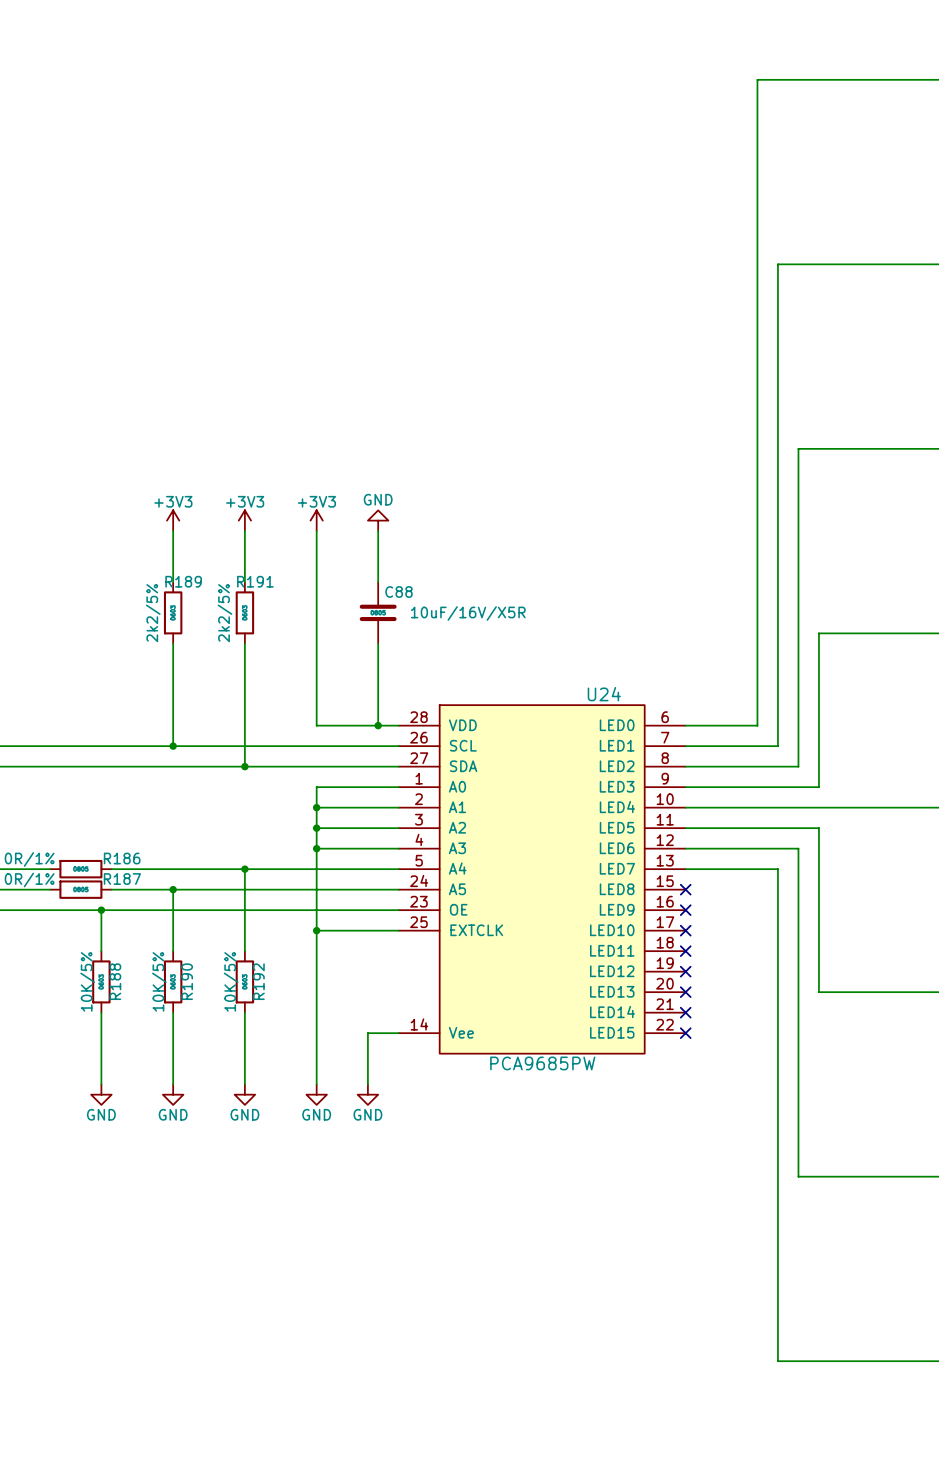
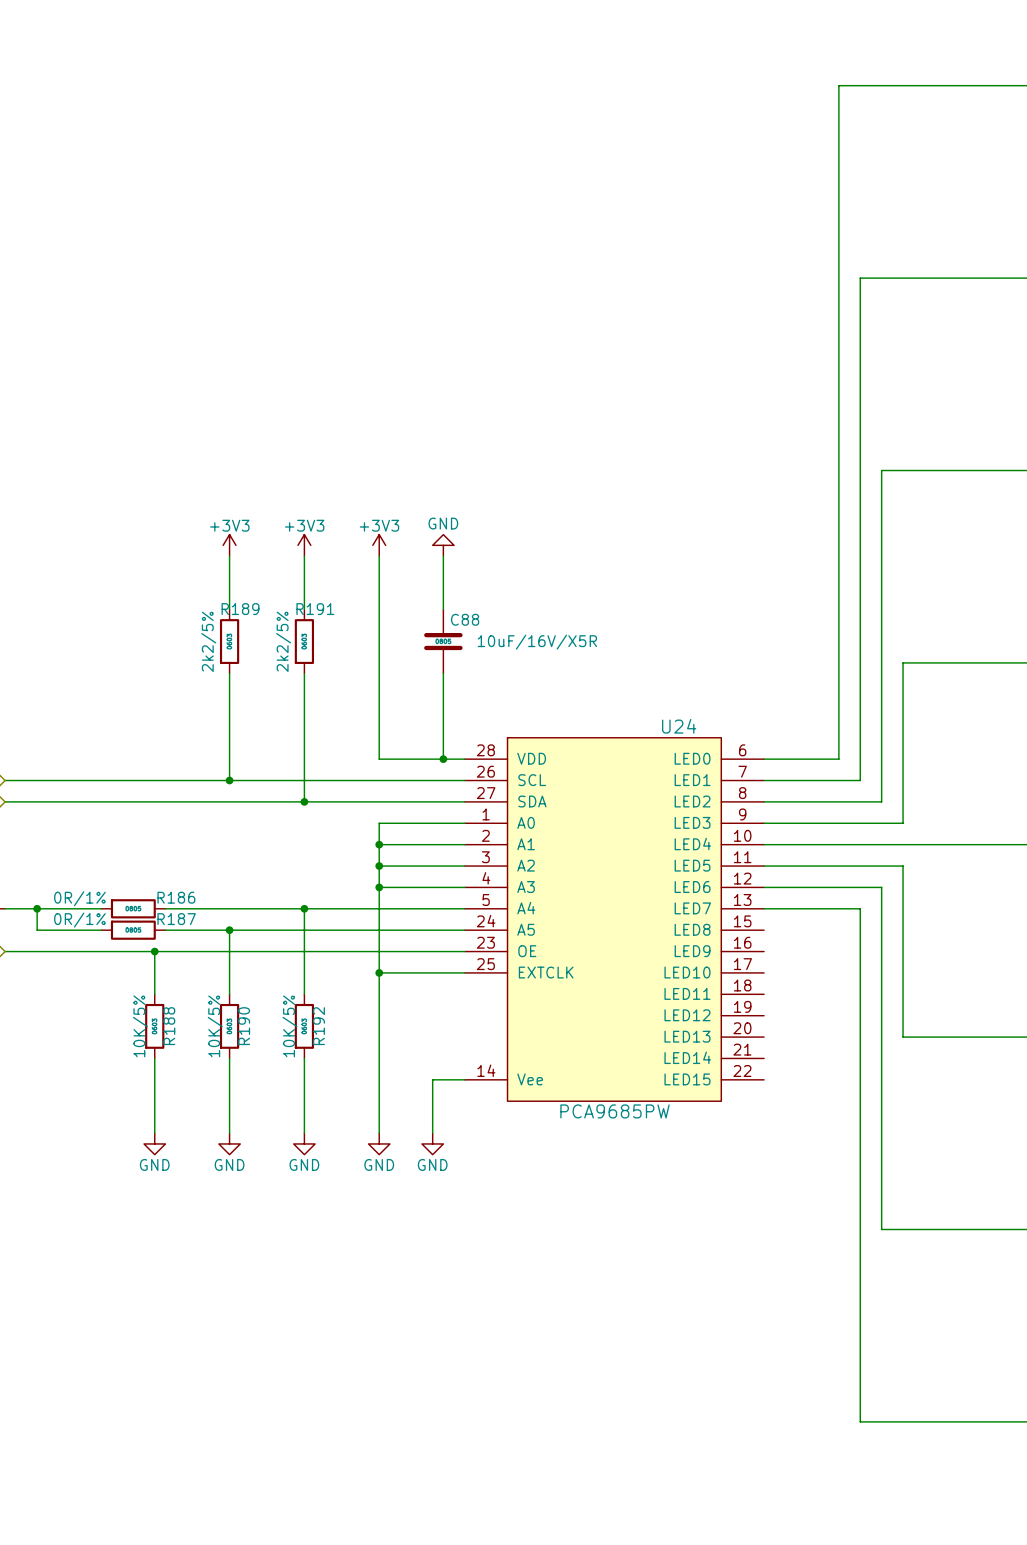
no-connect mark: (685, 889) -> none
no-connect mark: (685, 910) -> none
no-connect mark: (685, 930) -> none
no-connect mark: (685, 951) -> none
no-connect mark: (685, 971) -> none
no-connect mark: (685, 992) -> none
no-connect mark: (685, 1012) -> none
no-connect mark: (685, 1033) -> none

